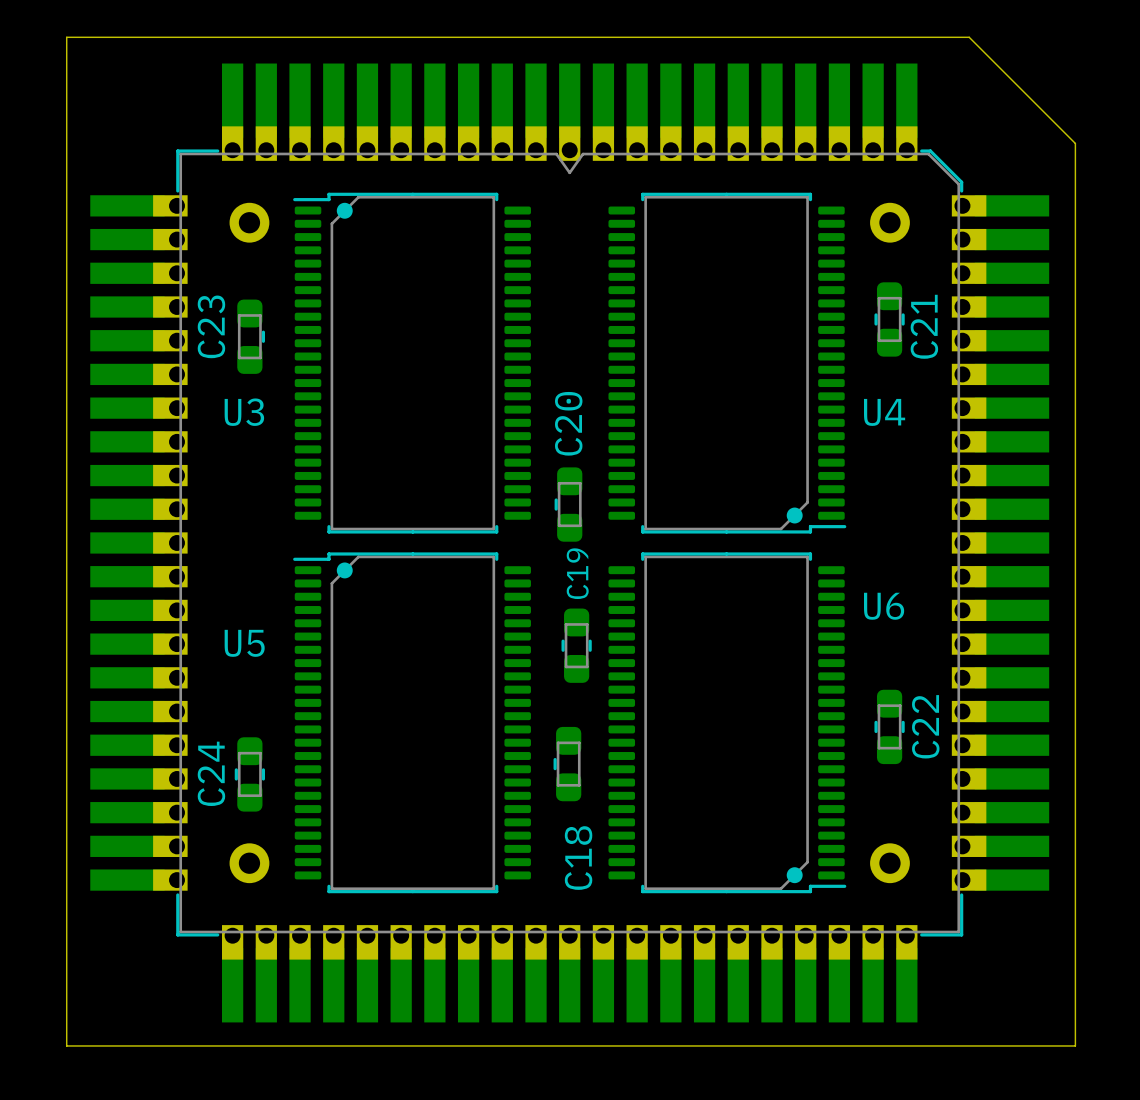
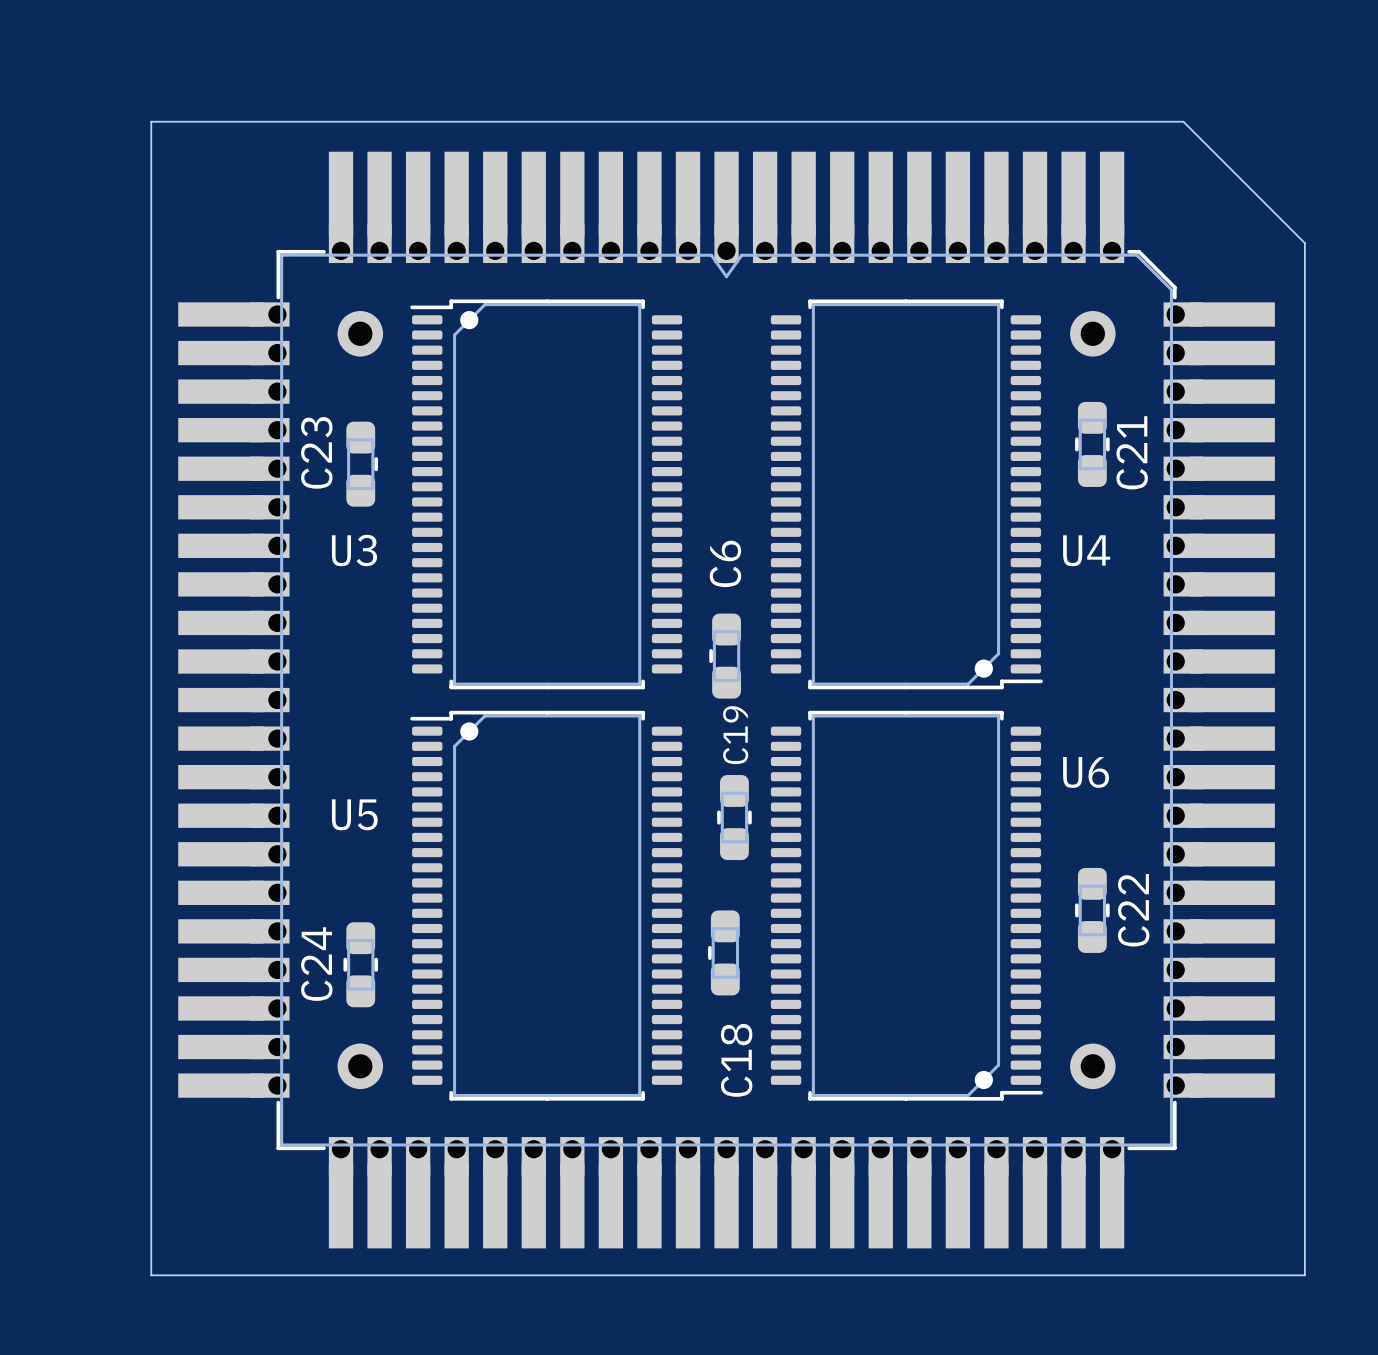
C20 name: C20 (568, 423) -> C6 (725, 563)

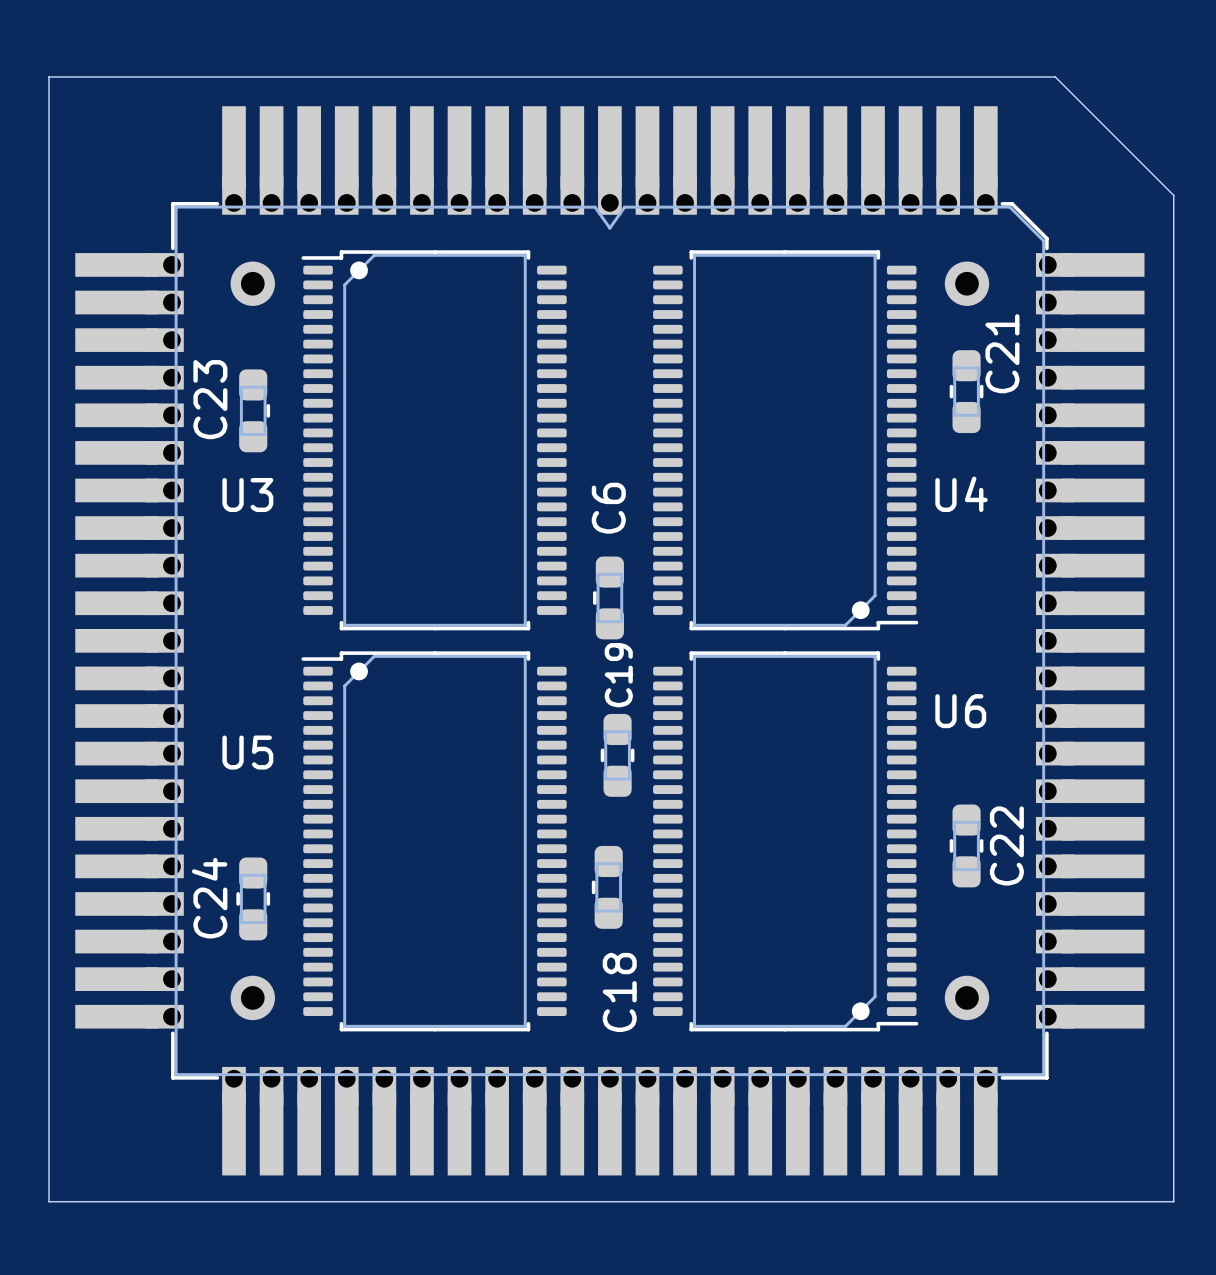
C21 name position: C21 (1132, 452) -> C21 (1002, 353)

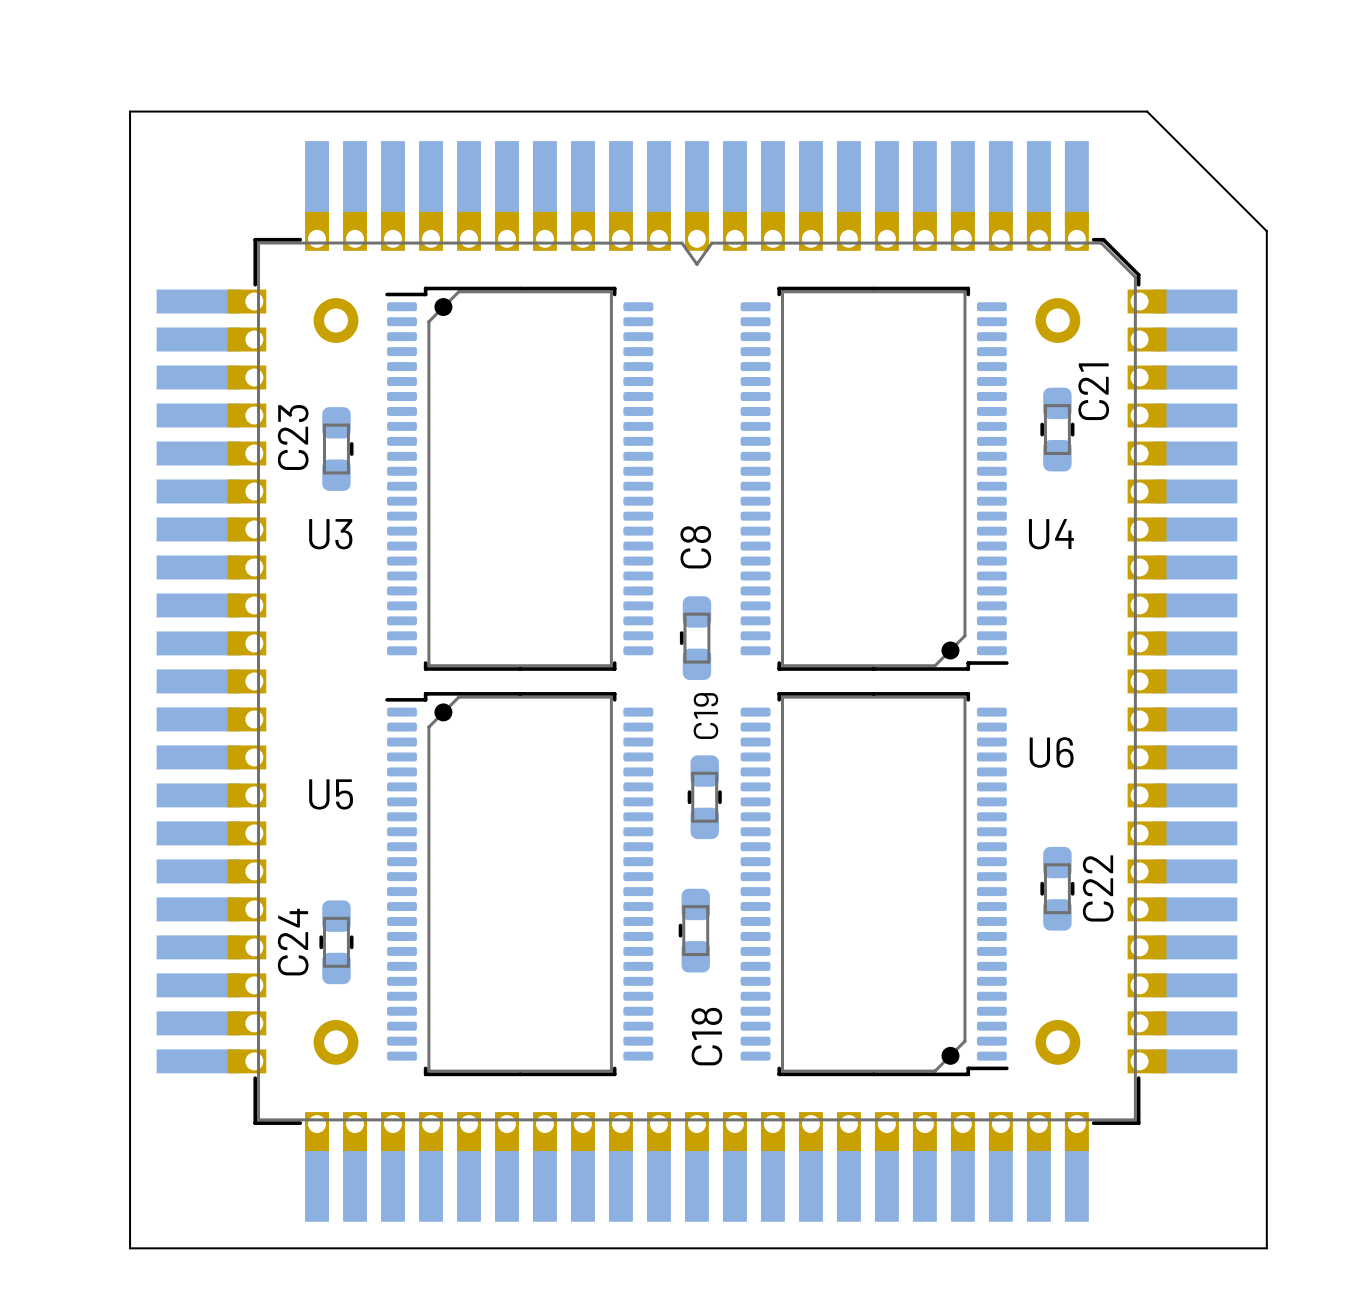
C6 name: C6 (608, 508) -> C8 (695, 547)

